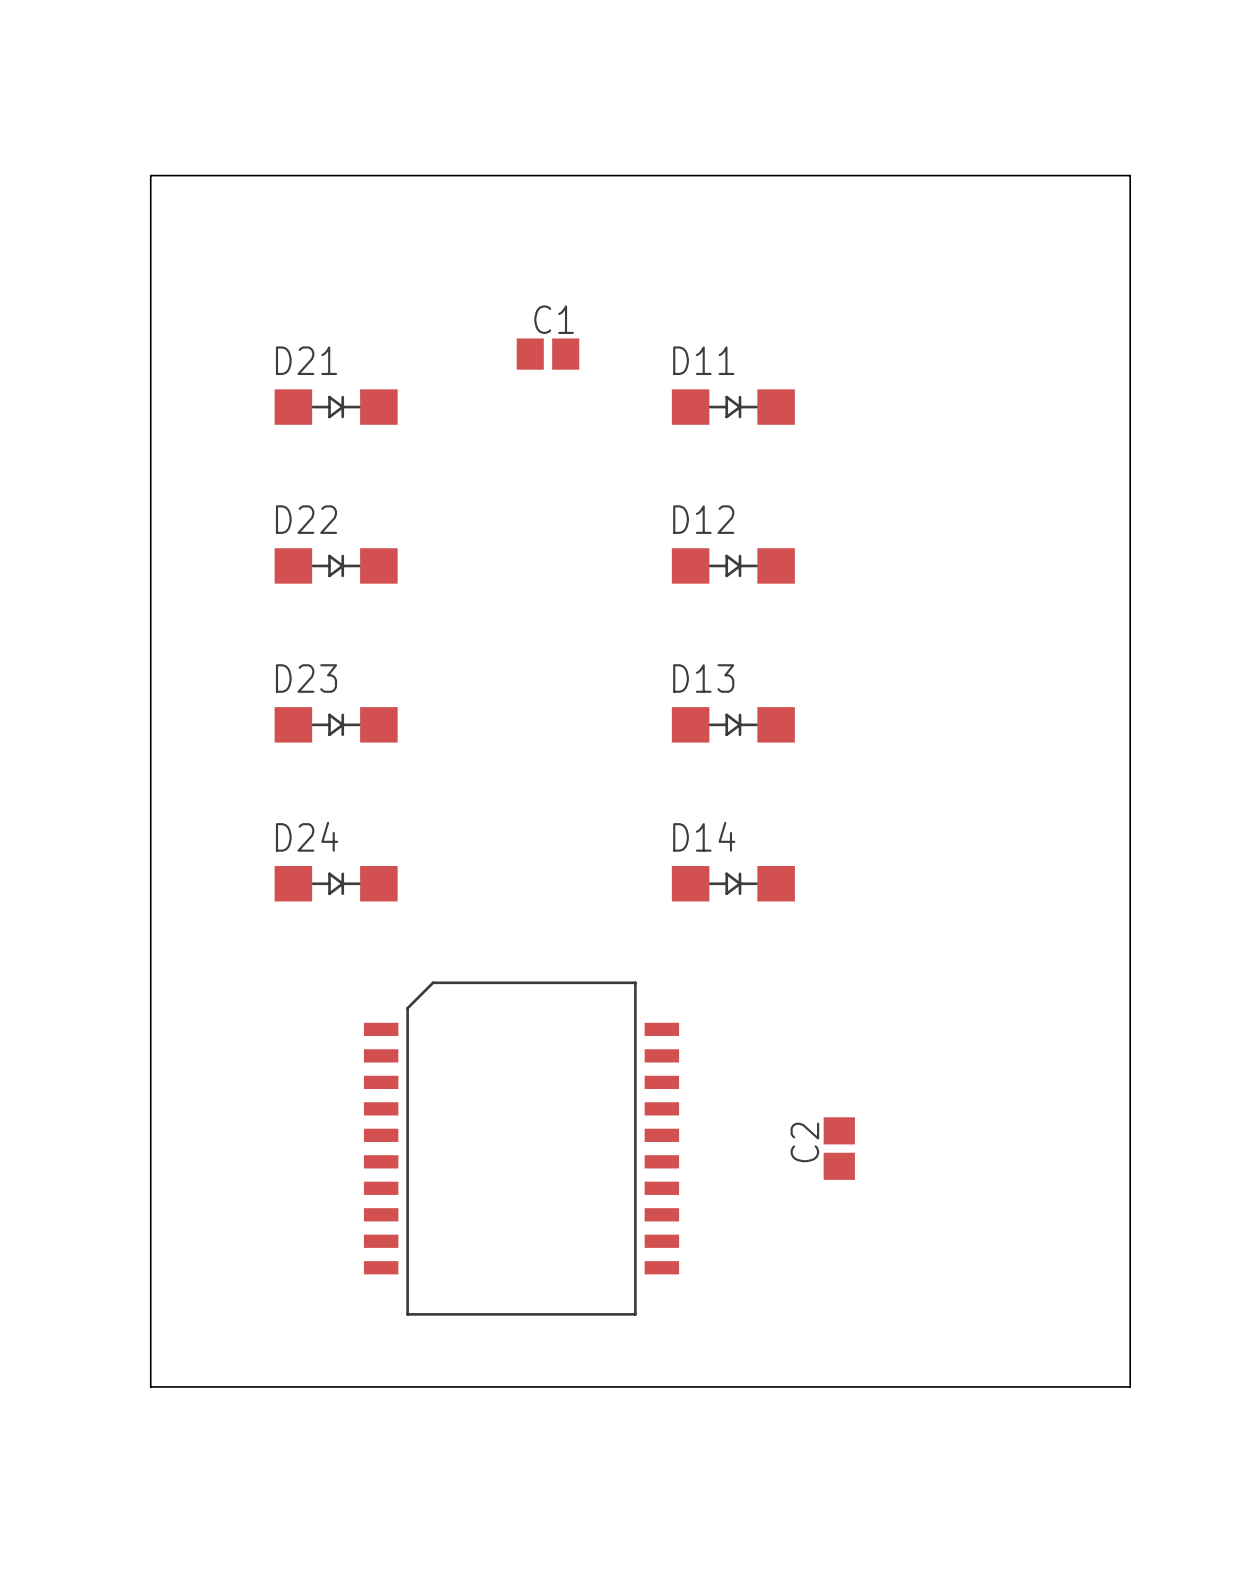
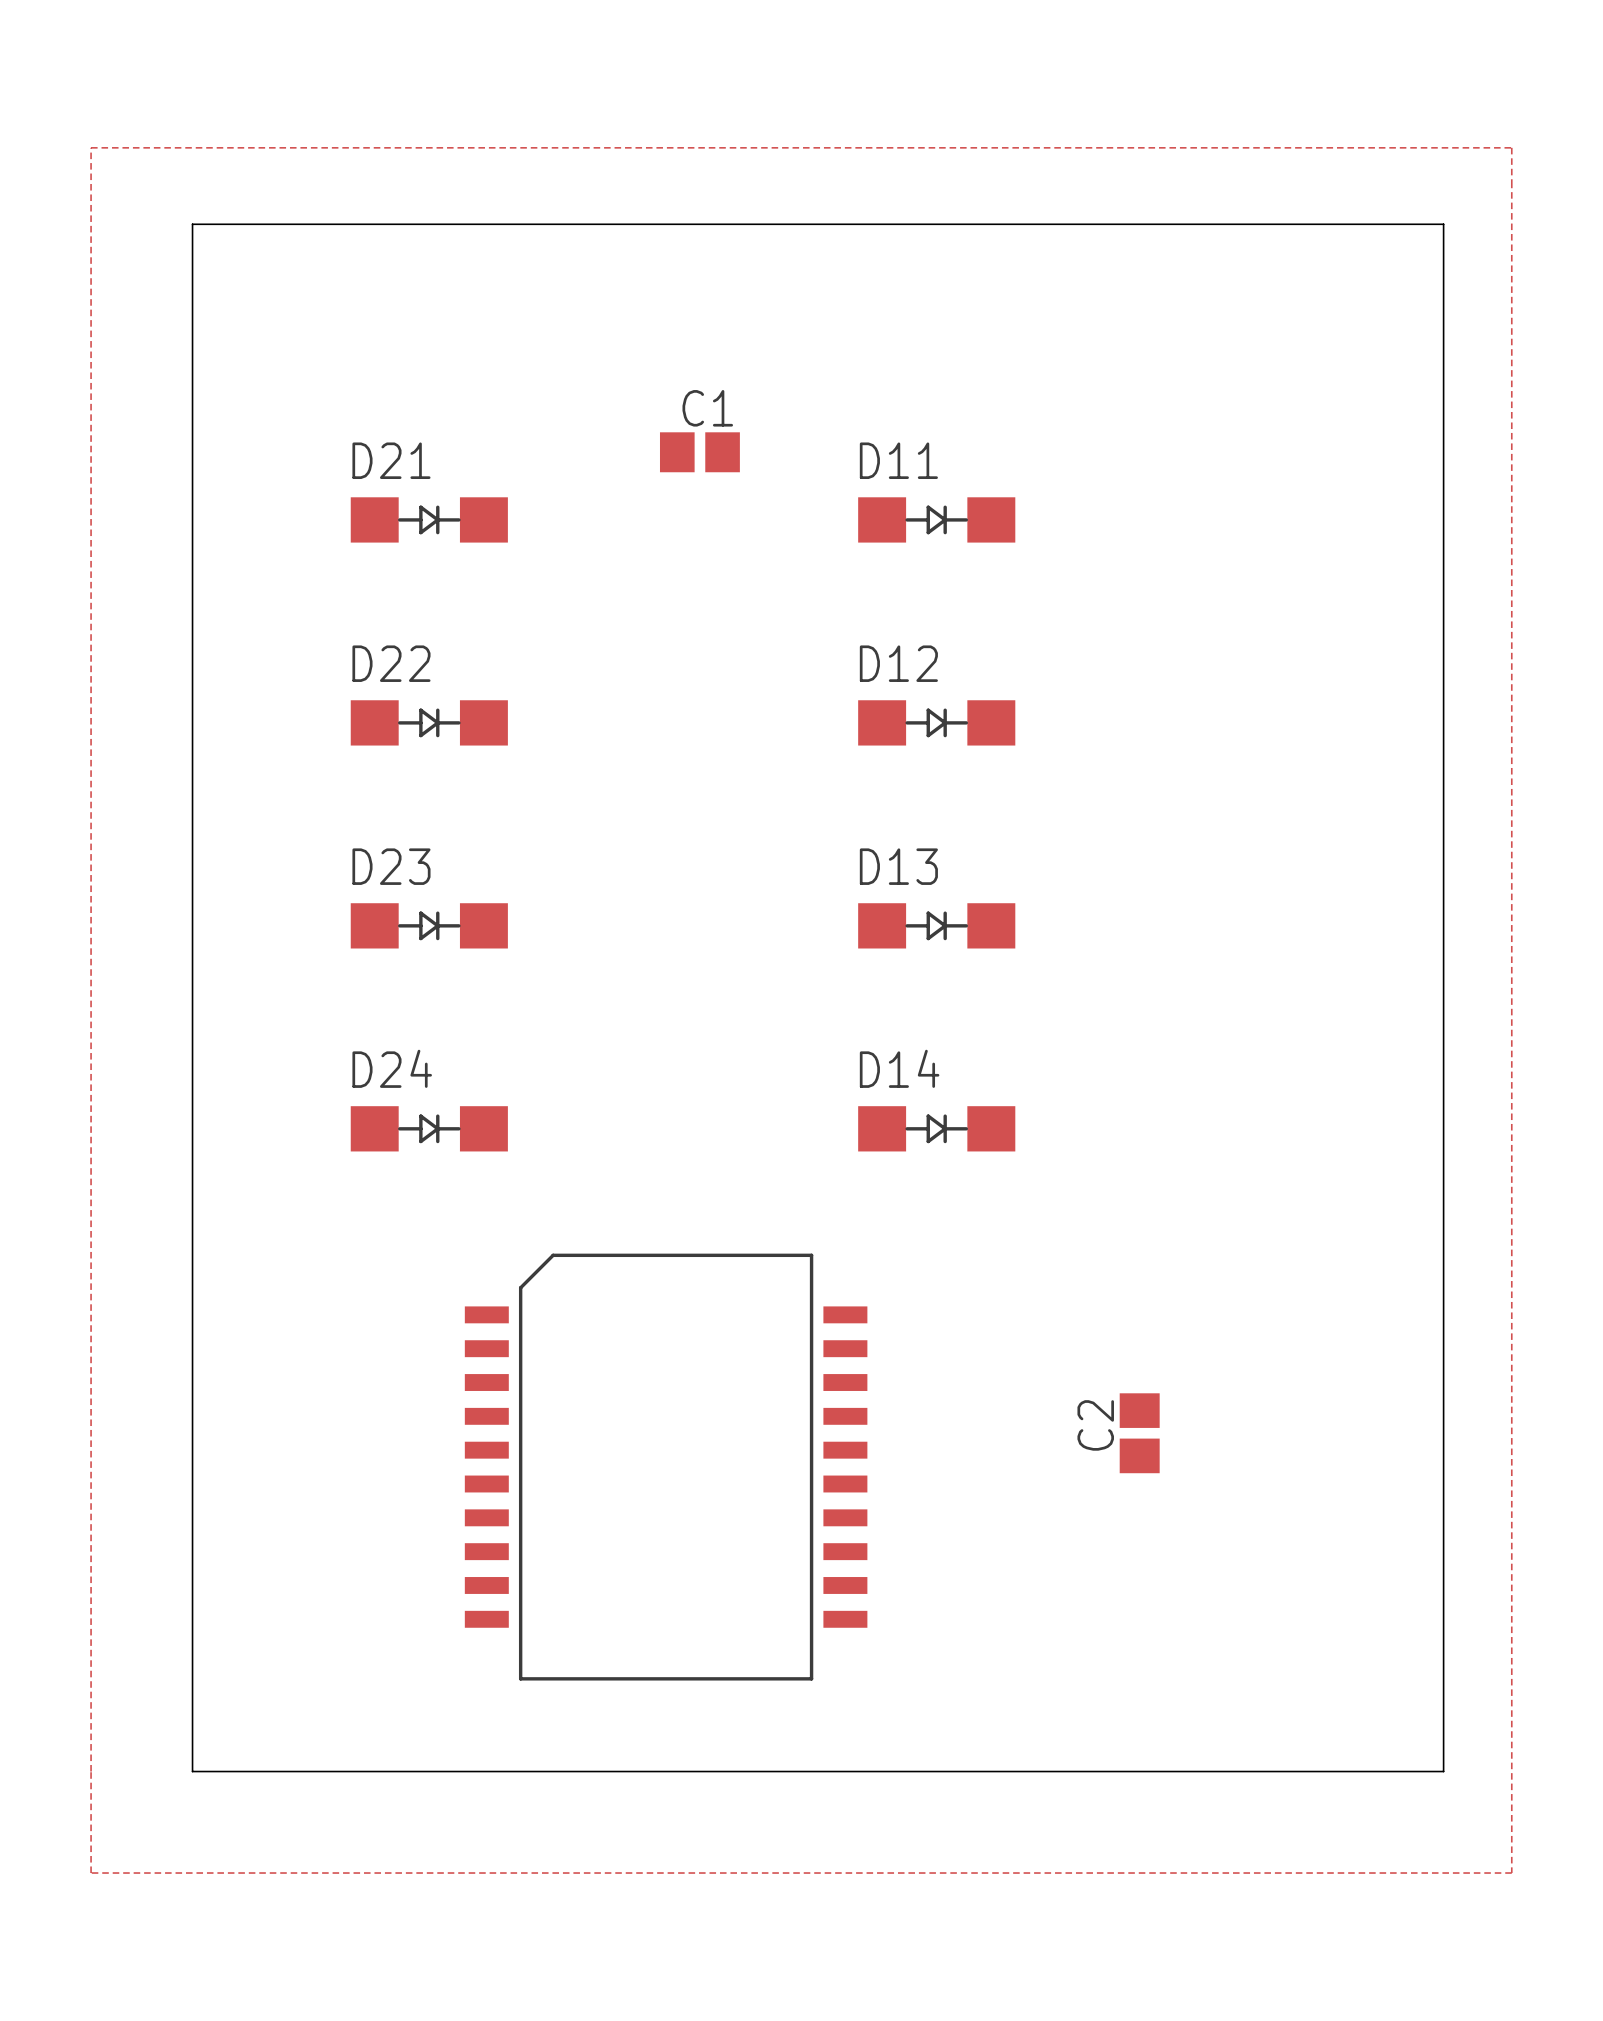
zone outline: none -> (91, 147) (91, 1873) (1511, 1873) (1511, 147) (91, 147)
C2 position: (839, 1148) -> (1139, 1433)

